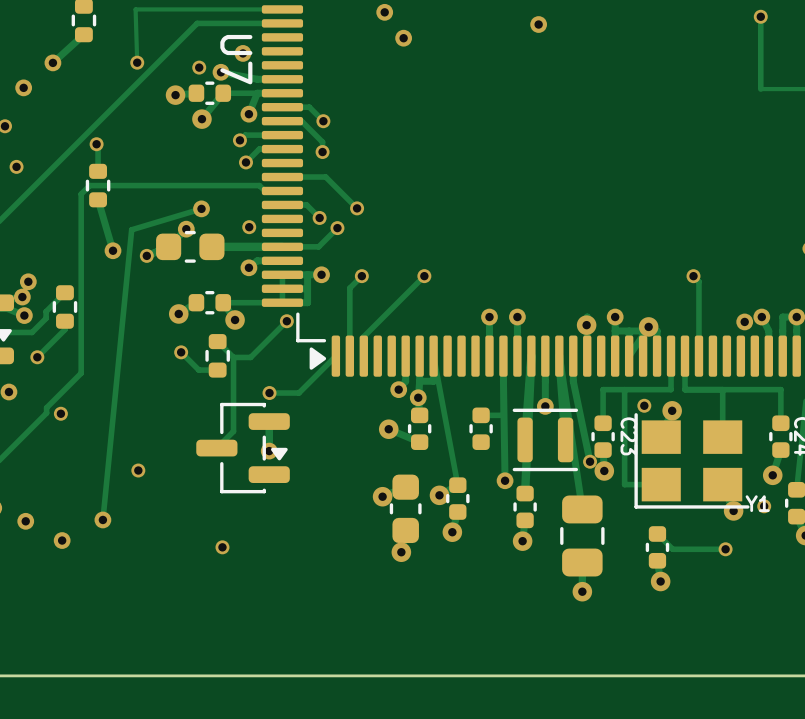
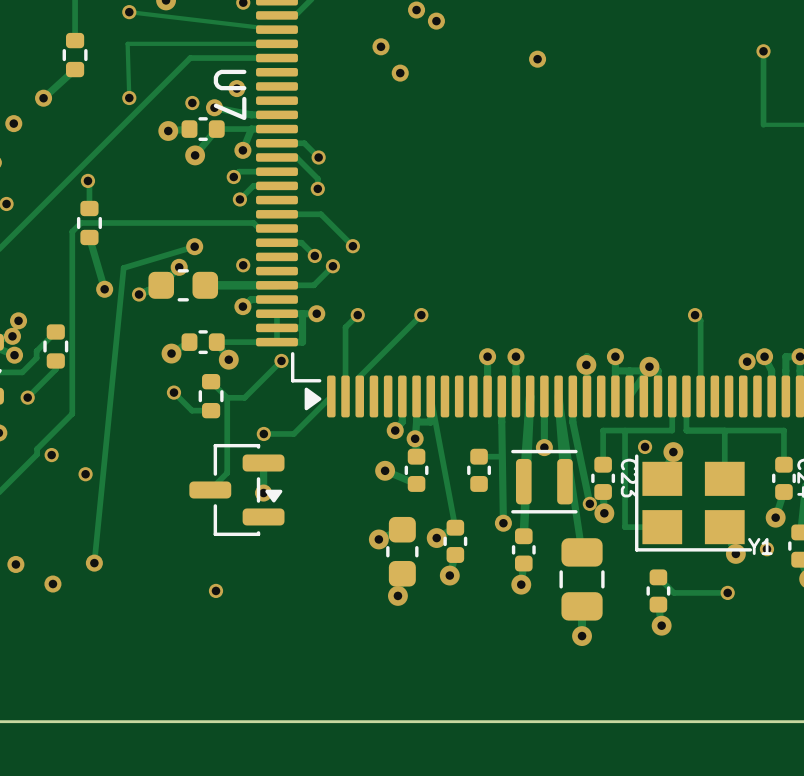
via position: (138, 470) -> (85, 474)

